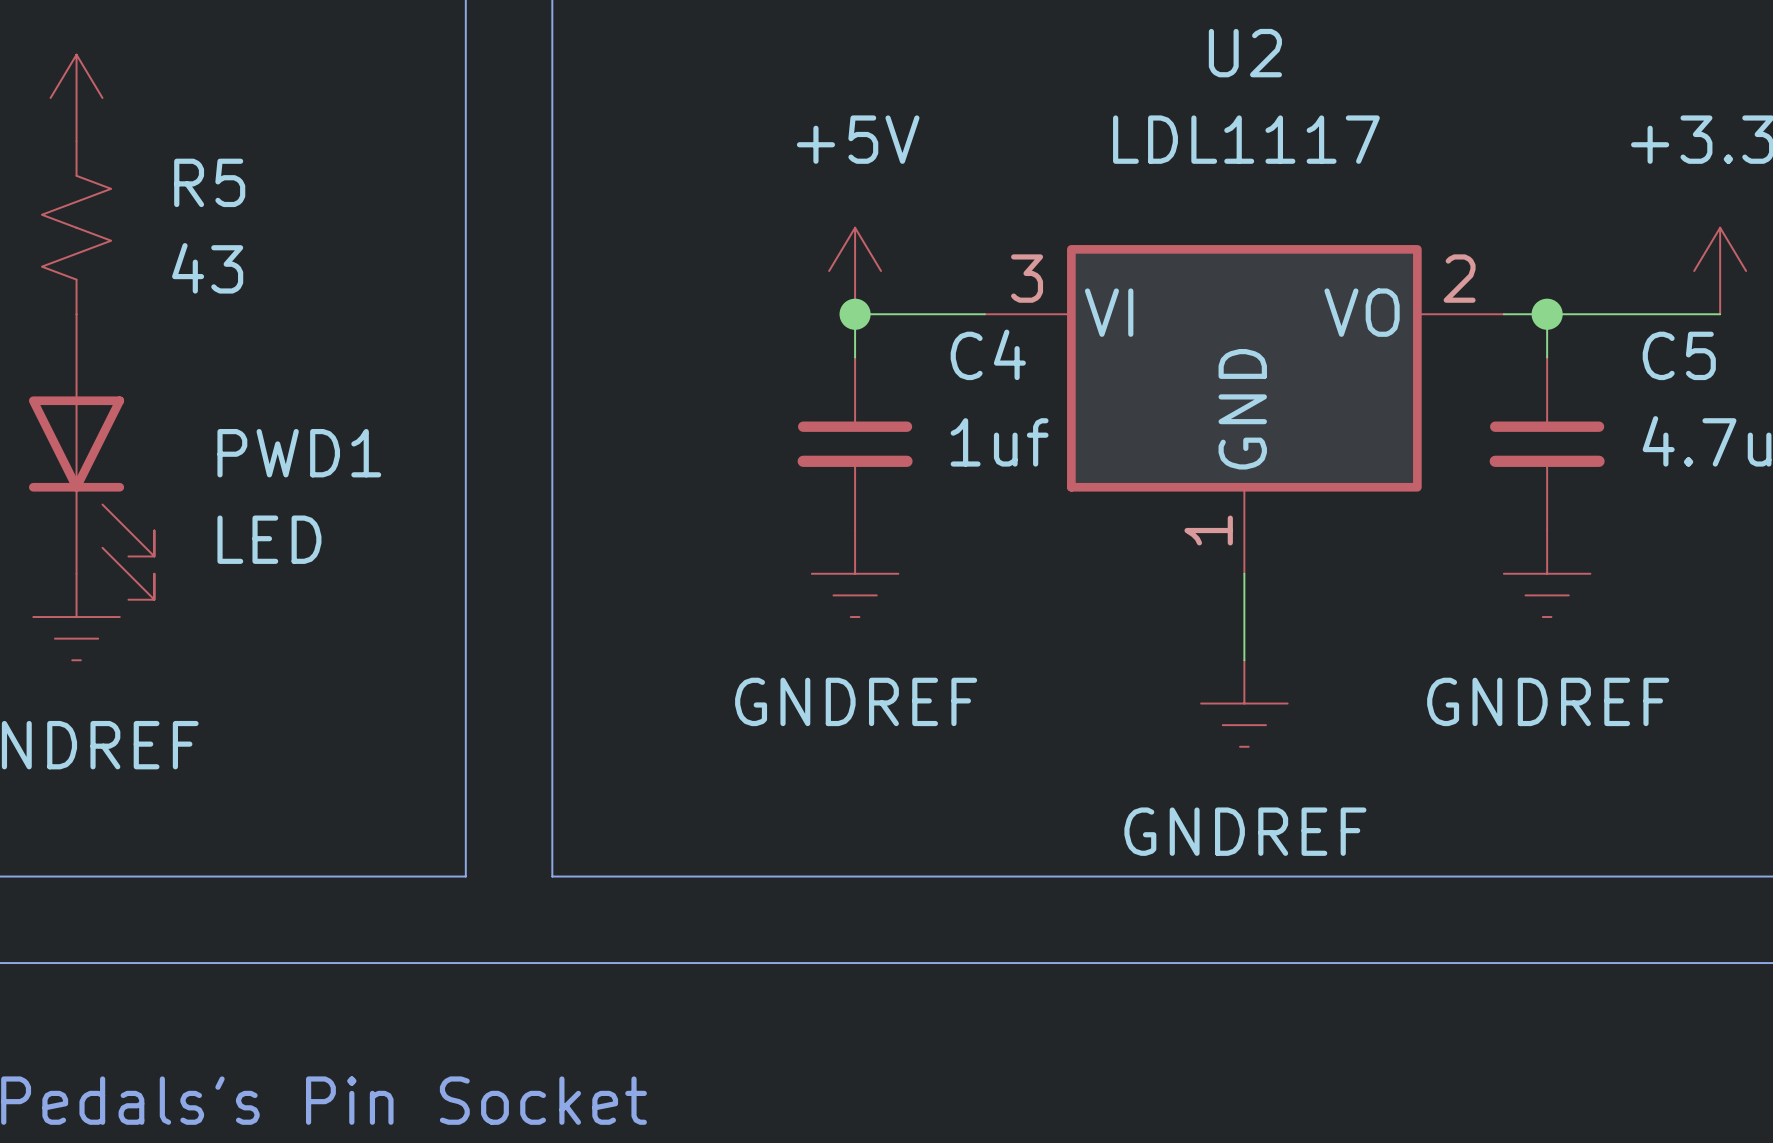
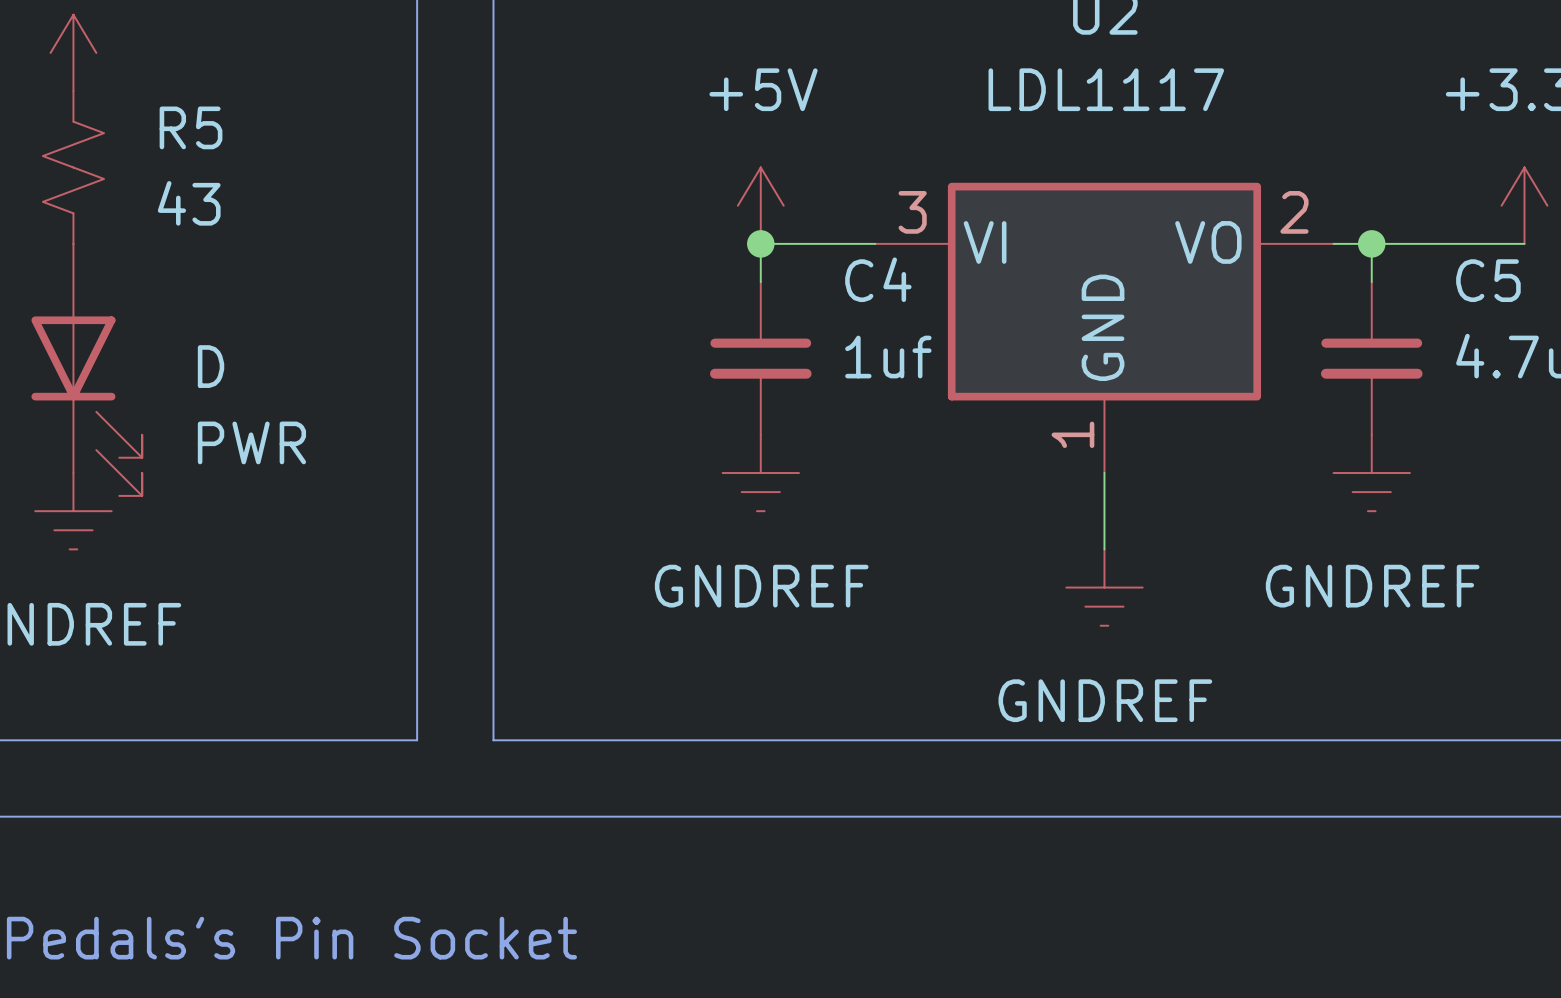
PWD1 name: PWD1 (299, 453) -> D (211, 366)
PWD1 value: LED (269, 539) -> PWR (251, 442)

